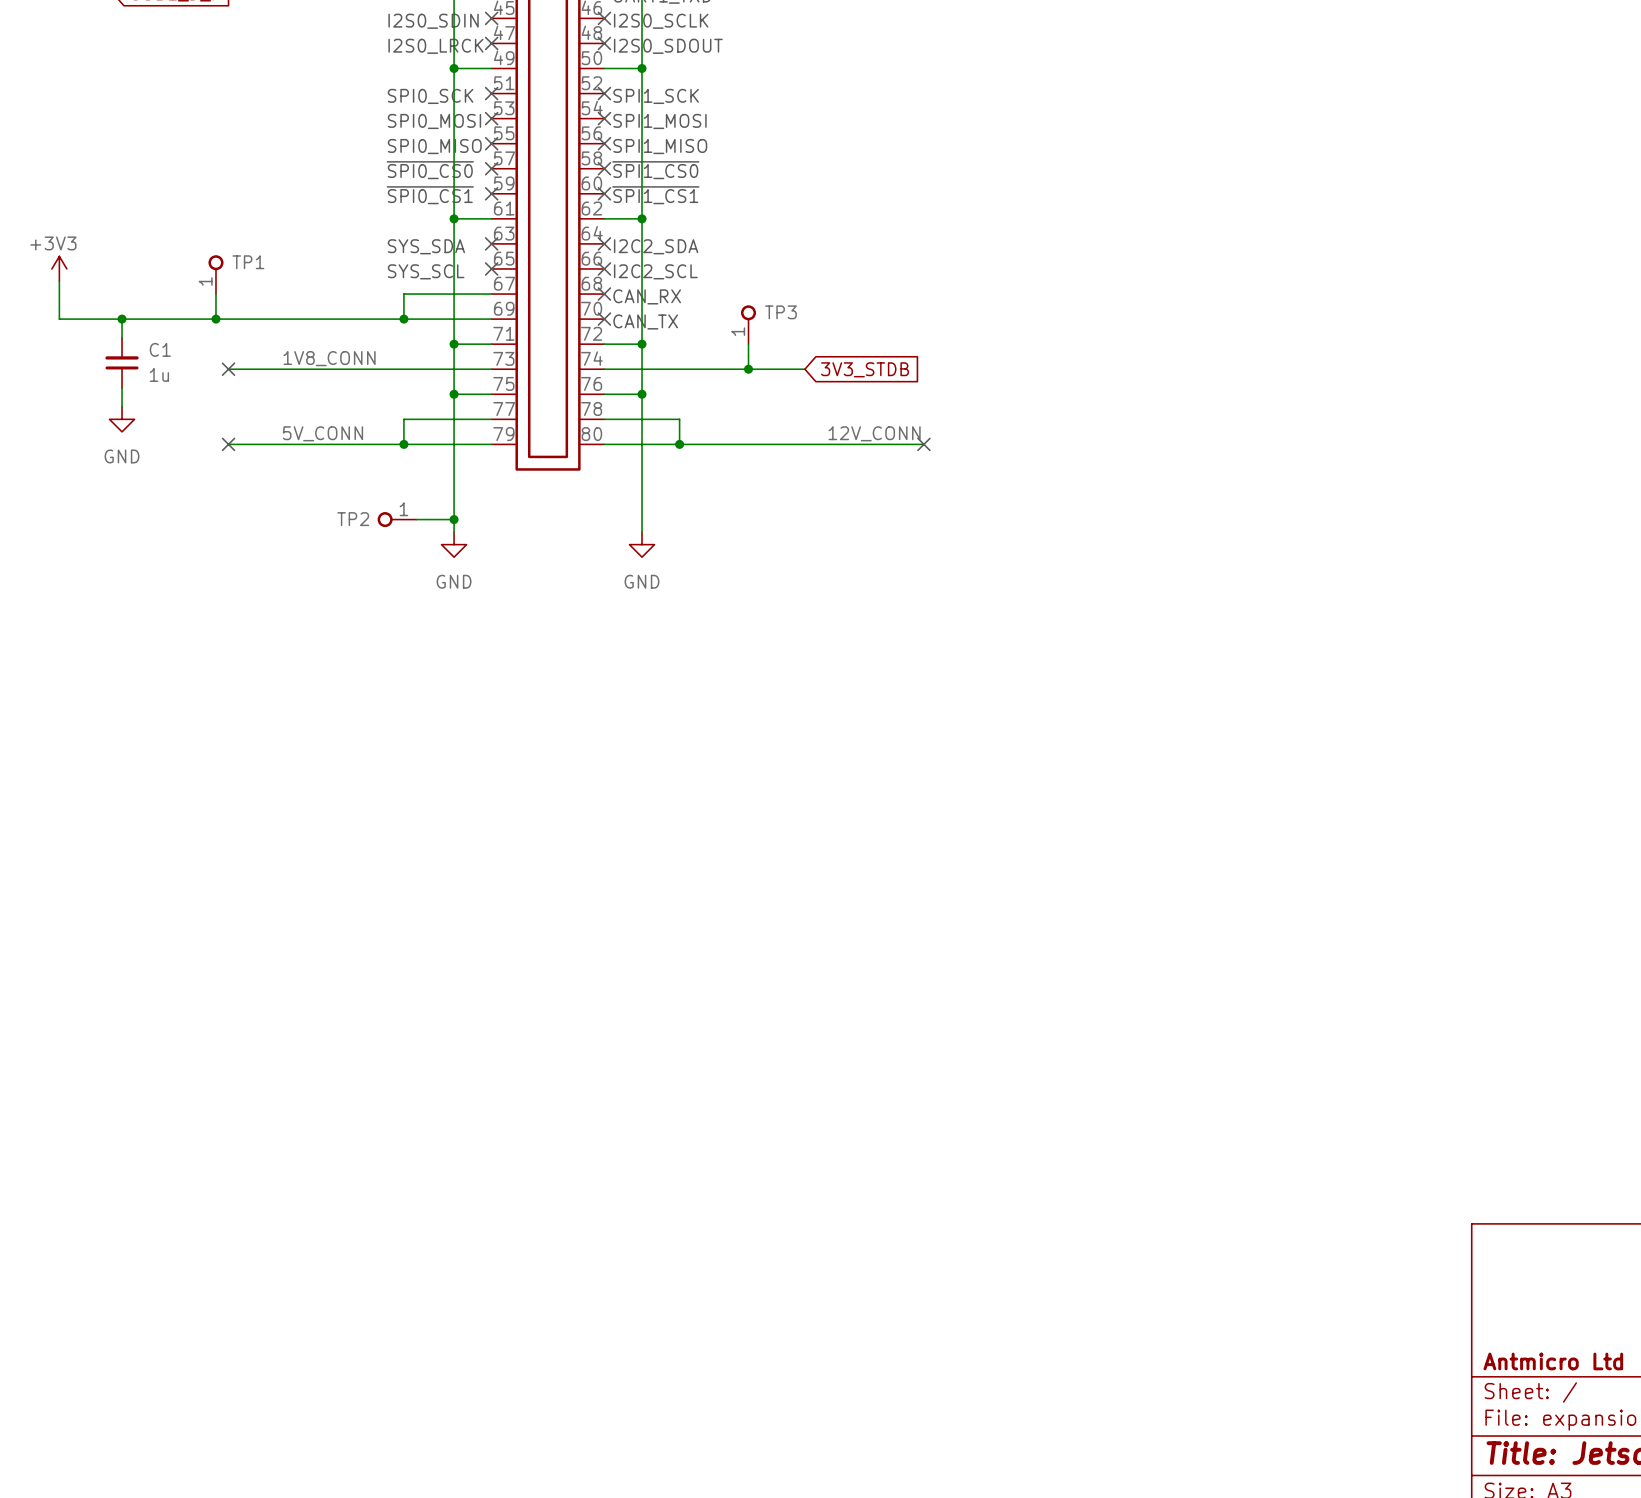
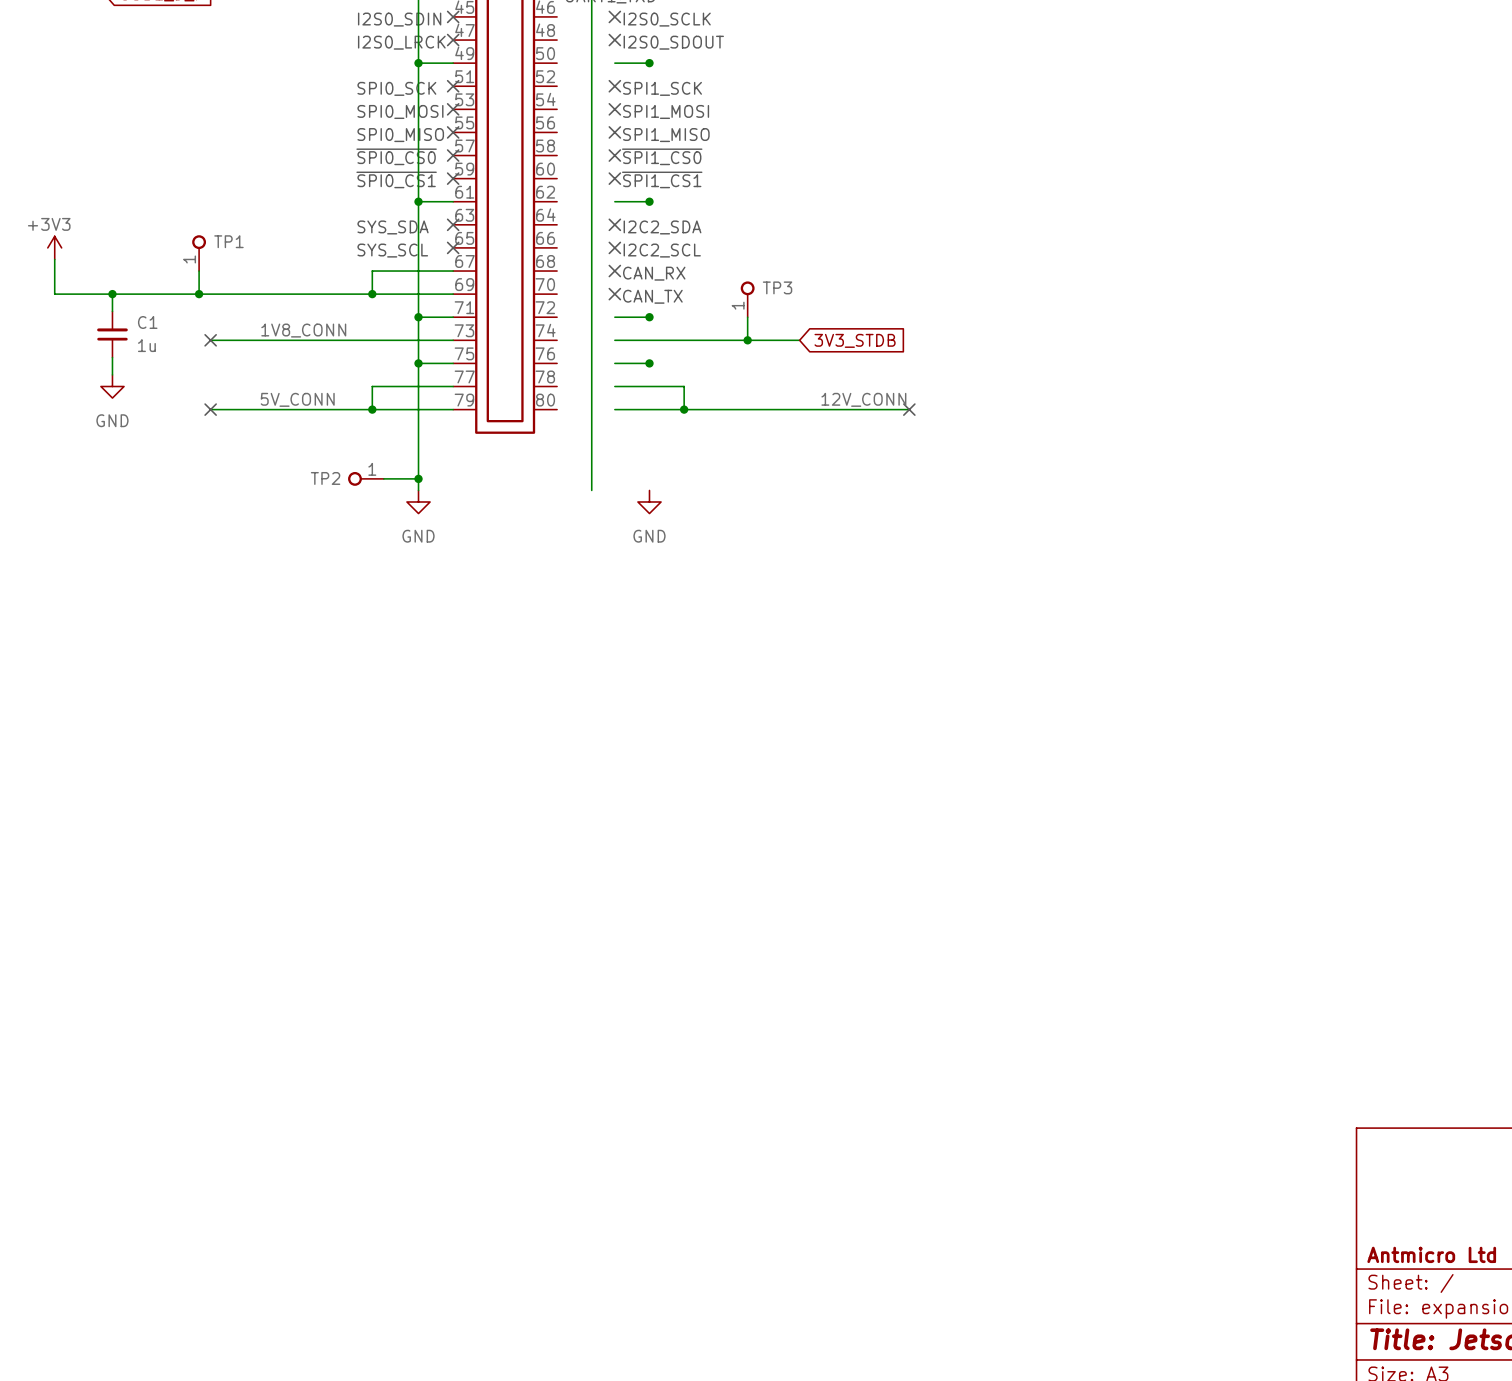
no-connect mark: (604, 18) -> none
no-connect mark: none -> (614, 16)
text position: I2S0_SCLK (661, 21) -> I2S0_SCLK (667, 19)
no-connect mark: (604, 43) -> none
no-connect mark: none -> (614, 40)
text position: I2S0_SDOUT (668, 46) -> I2S0_SDOUT (673, 42)
wire: (604, 68) (642, 68) -> (614, 63) (649, 63)
junction: (642, 68) -> none
junction: none -> (649, 63)
no-connect mark: (604, 93) -> none
no-connect mark: none -> (614, 86)
text position: SPI1_SCK (656, 96) -> SPI1_SCK (662, 88)
no-connect mark: (604, 118) -> none
no-connect mark: none -> (614, 109)
text position: SPI1_MOSI (660, 121) -> SPI1_MOSI (666, 111)
no-connect mark: (604, 143) -> none
no-connect mark: none -> (614, 132)
text position: SPI1_MISO (660, 146) -> SPI1_MISO (666, 135)
no-connect mark: (604, 168) -> none
no-connect mark: none -> (614, 155)
text position: ~{SPI1_CS0} (655, 170) -> ~{SPI1_CS0} (662, 156)
no-connect mark: (604, 193) -> none
no-connect mark: none -> (614, 178)
text position: ~{SPI1_CS1} (655, 195) -> ~{SPI1_CS1} (662, 179)
wire: (604, 218) (642, 218) -> (614, 201) (649, 201)
junction: (642, 218) -> none
junction: none -> (649, 201)
no-connect mark: (604, 243) -> none
no-connect mark: none -> (614, 224)
text position: I2C2_SDA (656, 246) -> I2C2_SDA (662, 227)
no-connect mark: (604, 268) -> none
no-connect mark: none -> (614, 247)
text position: I2C2_SCL (655, 271) -> I2C2_SCL (662, 250)
no-connect mark: (604, 294) -> none
no-connect mark: none -> (614, 271)
text position: CAN_RX (647, 296) -> CAN_RX (654, 273)
no-connect mark: (604, 319) -> none
no-connect mark: none -> (614, 294)
text position: CAN_TX (645, 321) -> CAN_TX (652, 296)
TP3 position: (748, 324) -> (747, 299)
wire: (604, 344) (642, 344) -> (614, 317) (649, 317)
junction: (642, 344) -> none
junction: none -> (649, 317)
wire: (748, 344) (748, 369) -> (747, 317) (747, 340)
wire: (604, 369) (667, 369) -> (741, 340) (799, 340)
junction: (748, 369) -> none
junction: none -> (747, 340)
global label position: 3V3_STDB (865, 369) -> 3V3_STDB (855, 340)
wire: (604, 394) (642, 394) -> (614, 363) (649, 363)
junction: (642, 394) -> none
junction: none -> (649, 363)
wire: (604, 419) (667, 419) -> none
wire: (679, 419) (679, 444) -> (626, 386) (684, 386) (684, 409)
label position: 12V_CONN (874, 433) -> 12V_CONN (863, 399)
wire: (604, 444) (667, 444) -> none
junction: (679, 444) -> none
junction: none -> (684, 409)
wire: none -> (851, 409) (909, 409)
no-connect mark: (923, 444) -> none
no-connect mark: none -> (909, 409)
power symbol position: GND (642, 544) -> GND (649, 501)

